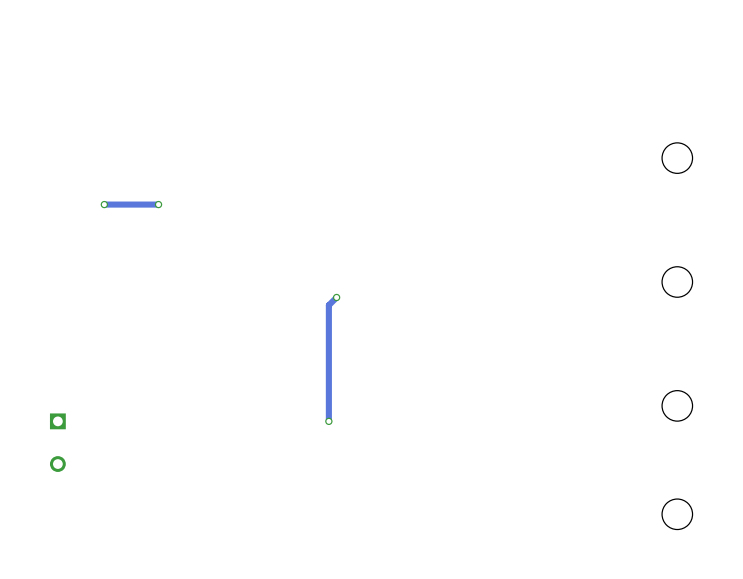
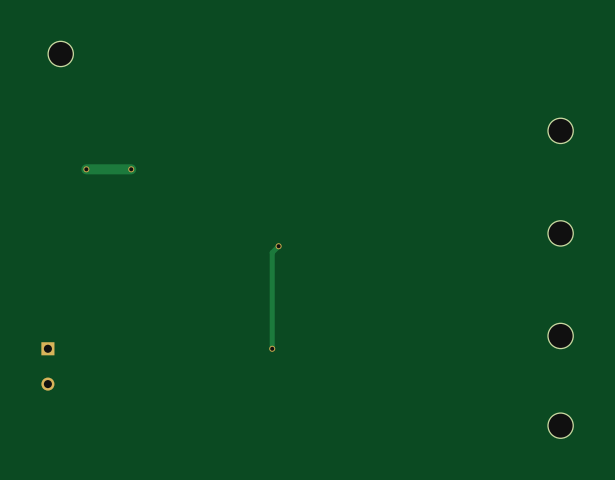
part: none -> (60, 53)
track width: thin (158, 204) (104, 204) -> thick (131, 169) (86, 169)

